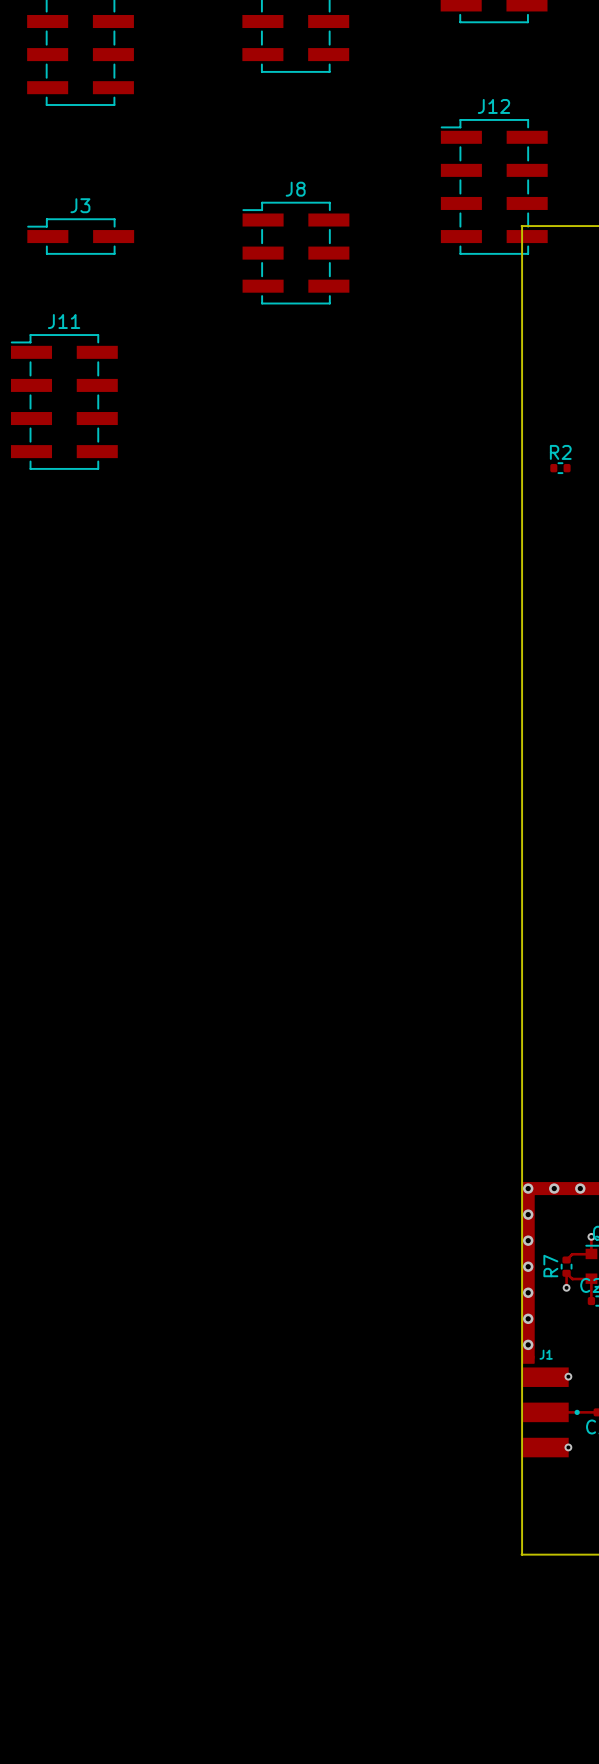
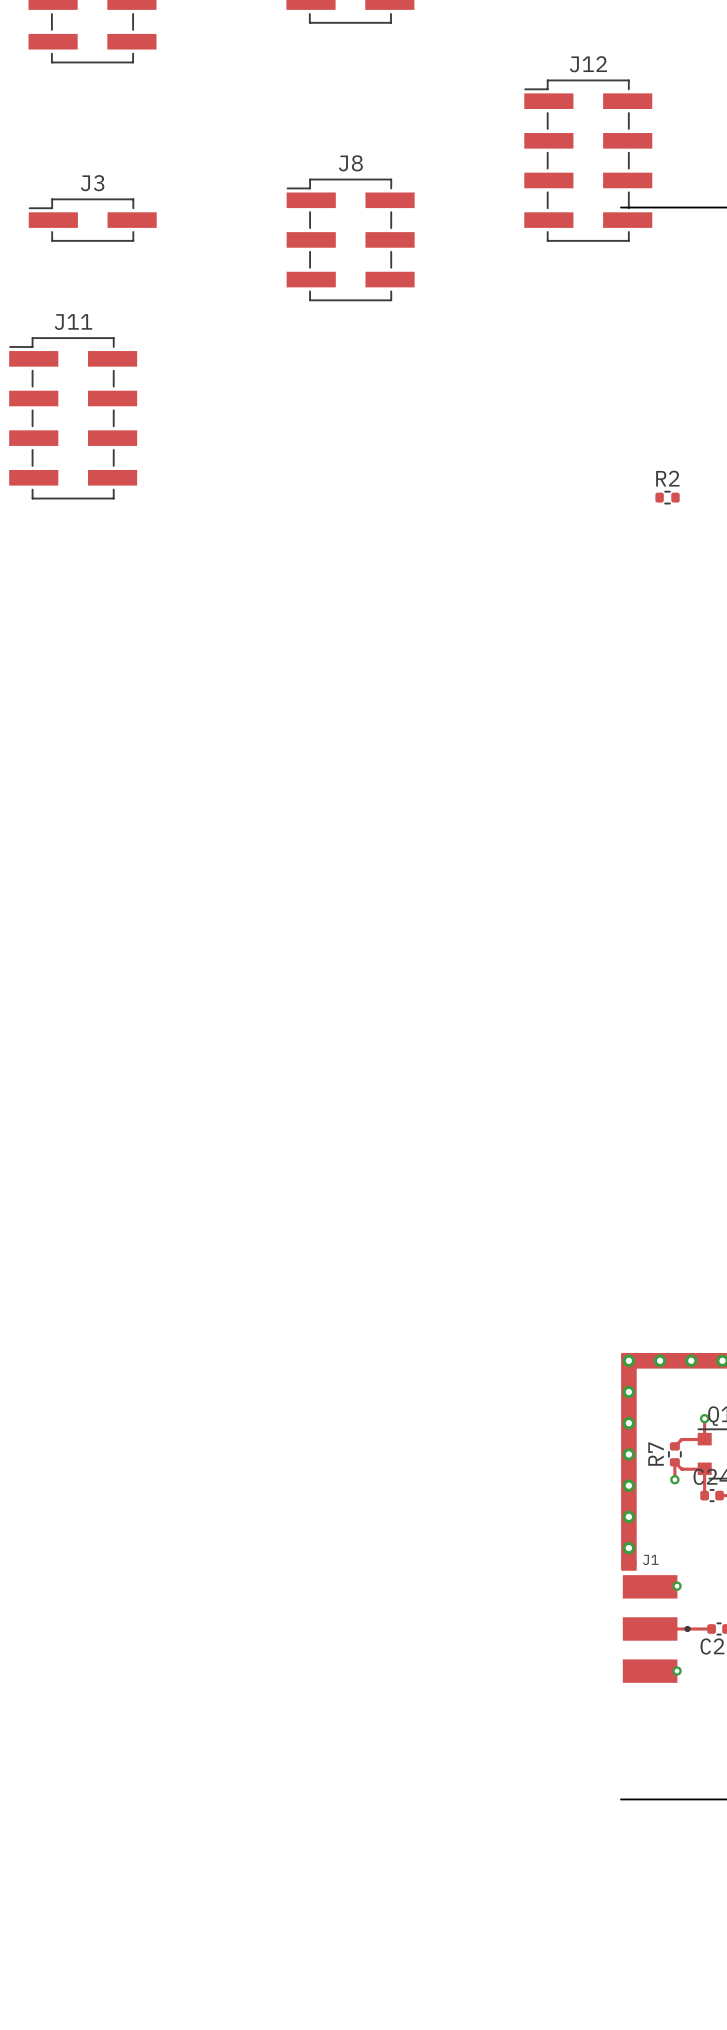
board edge: (522, 226) (522, 1554) -> none

